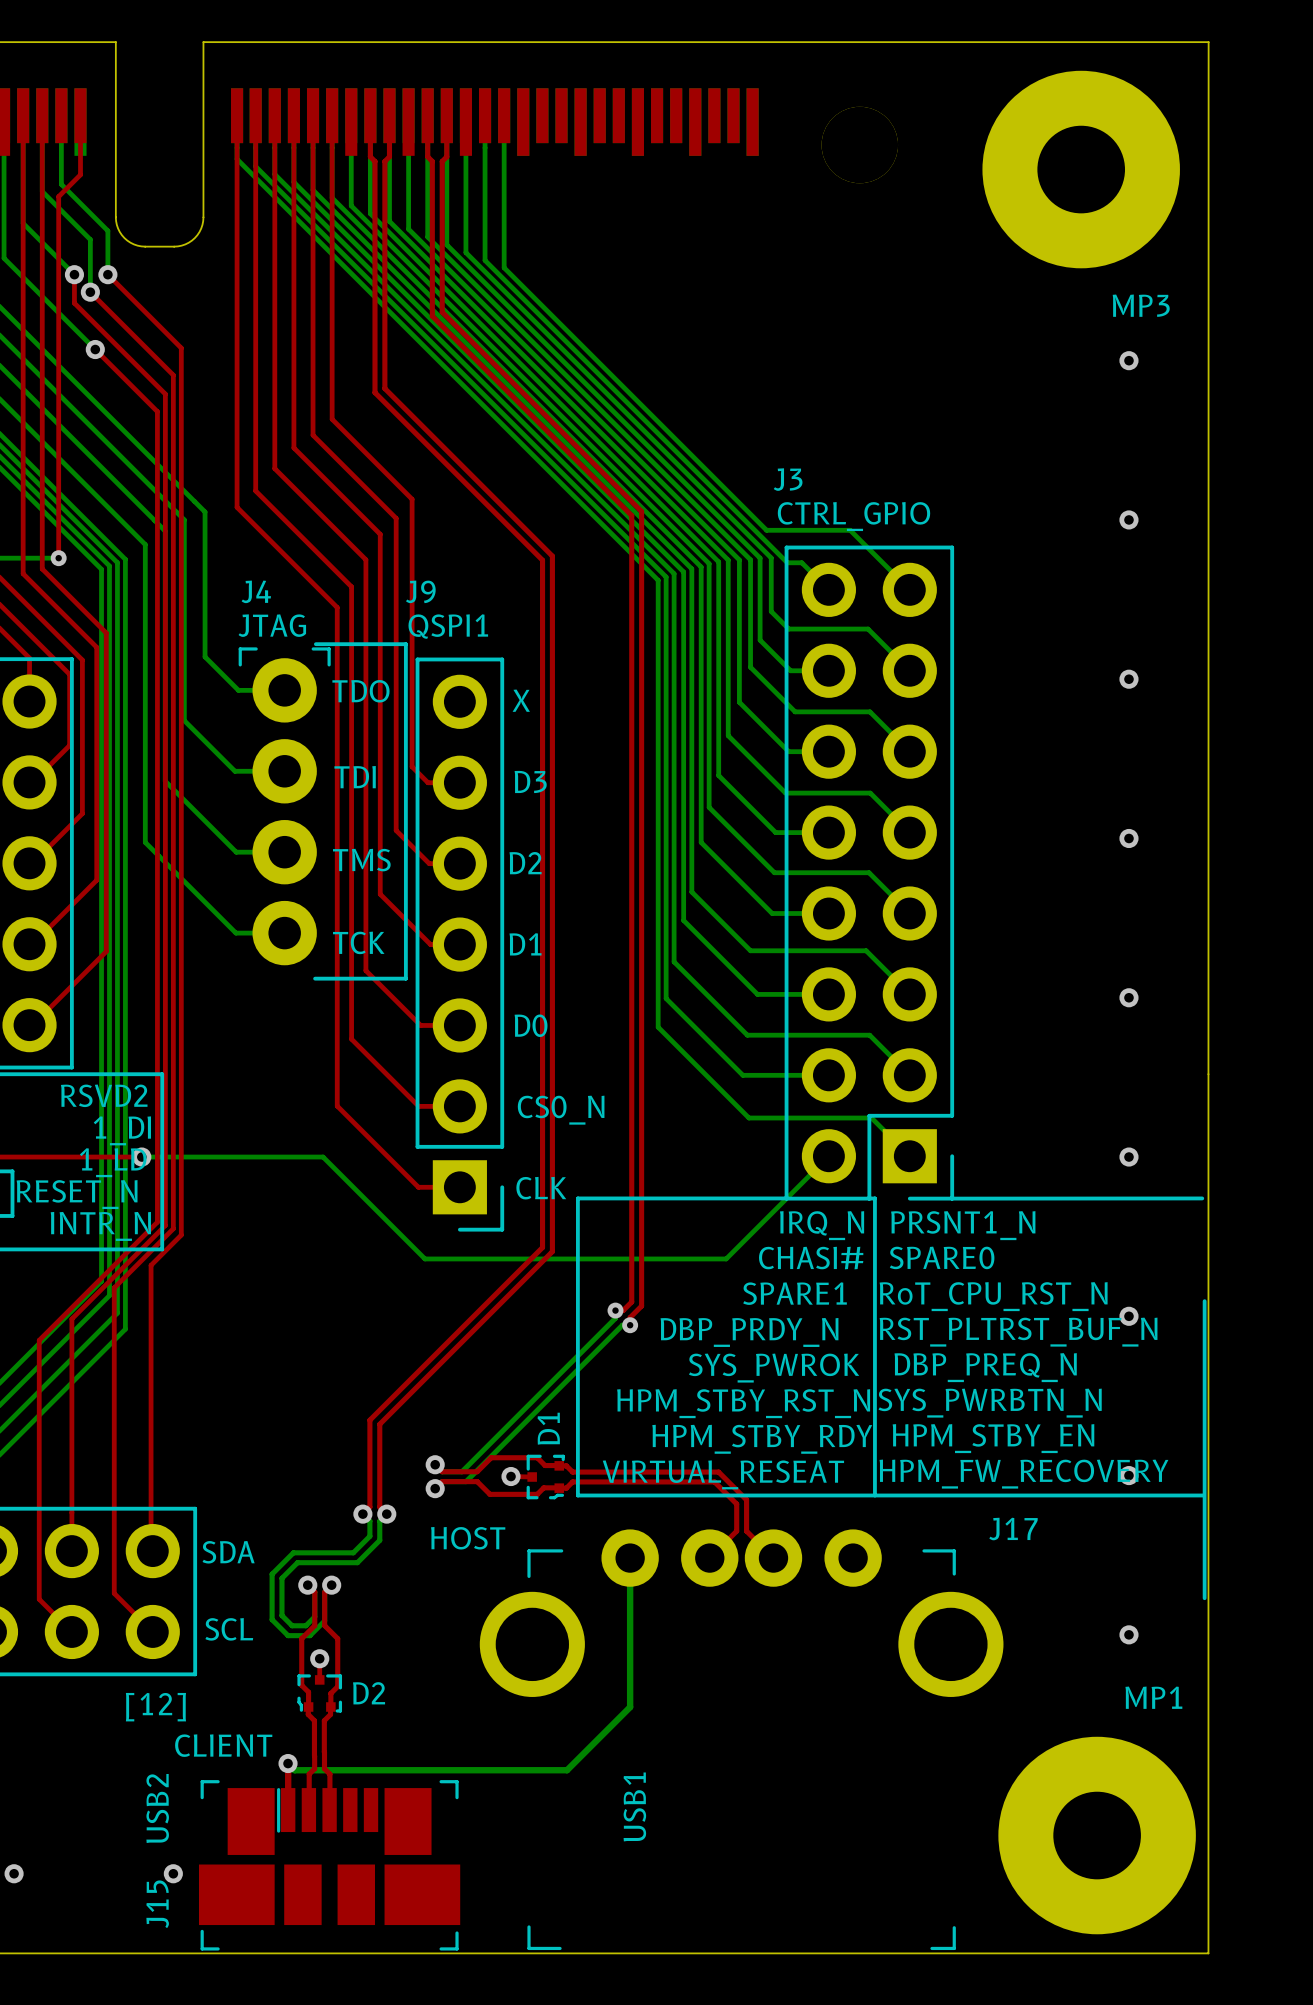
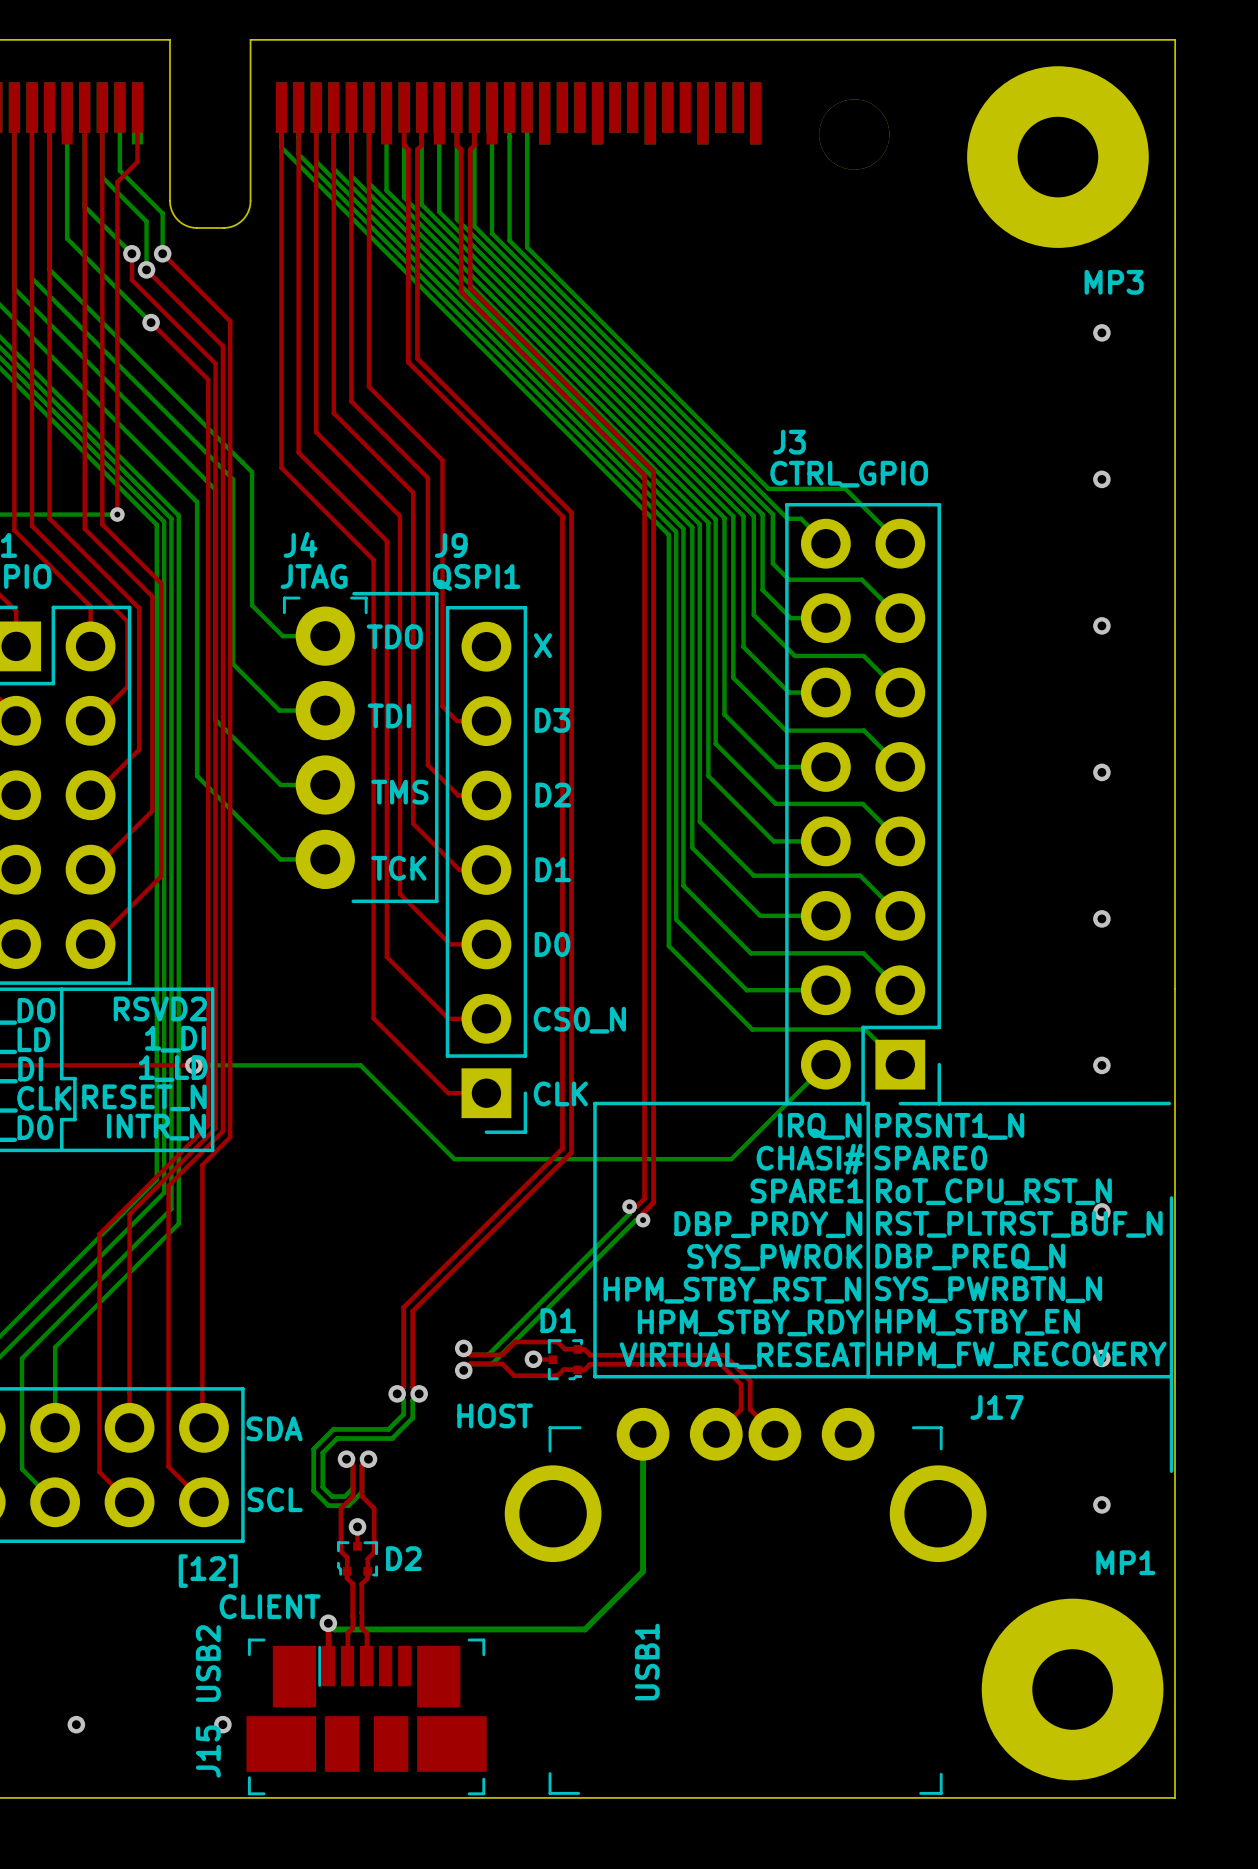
D1 name rotation: 0° (548, 1428) -> 90° clockwise (558, 1320)

